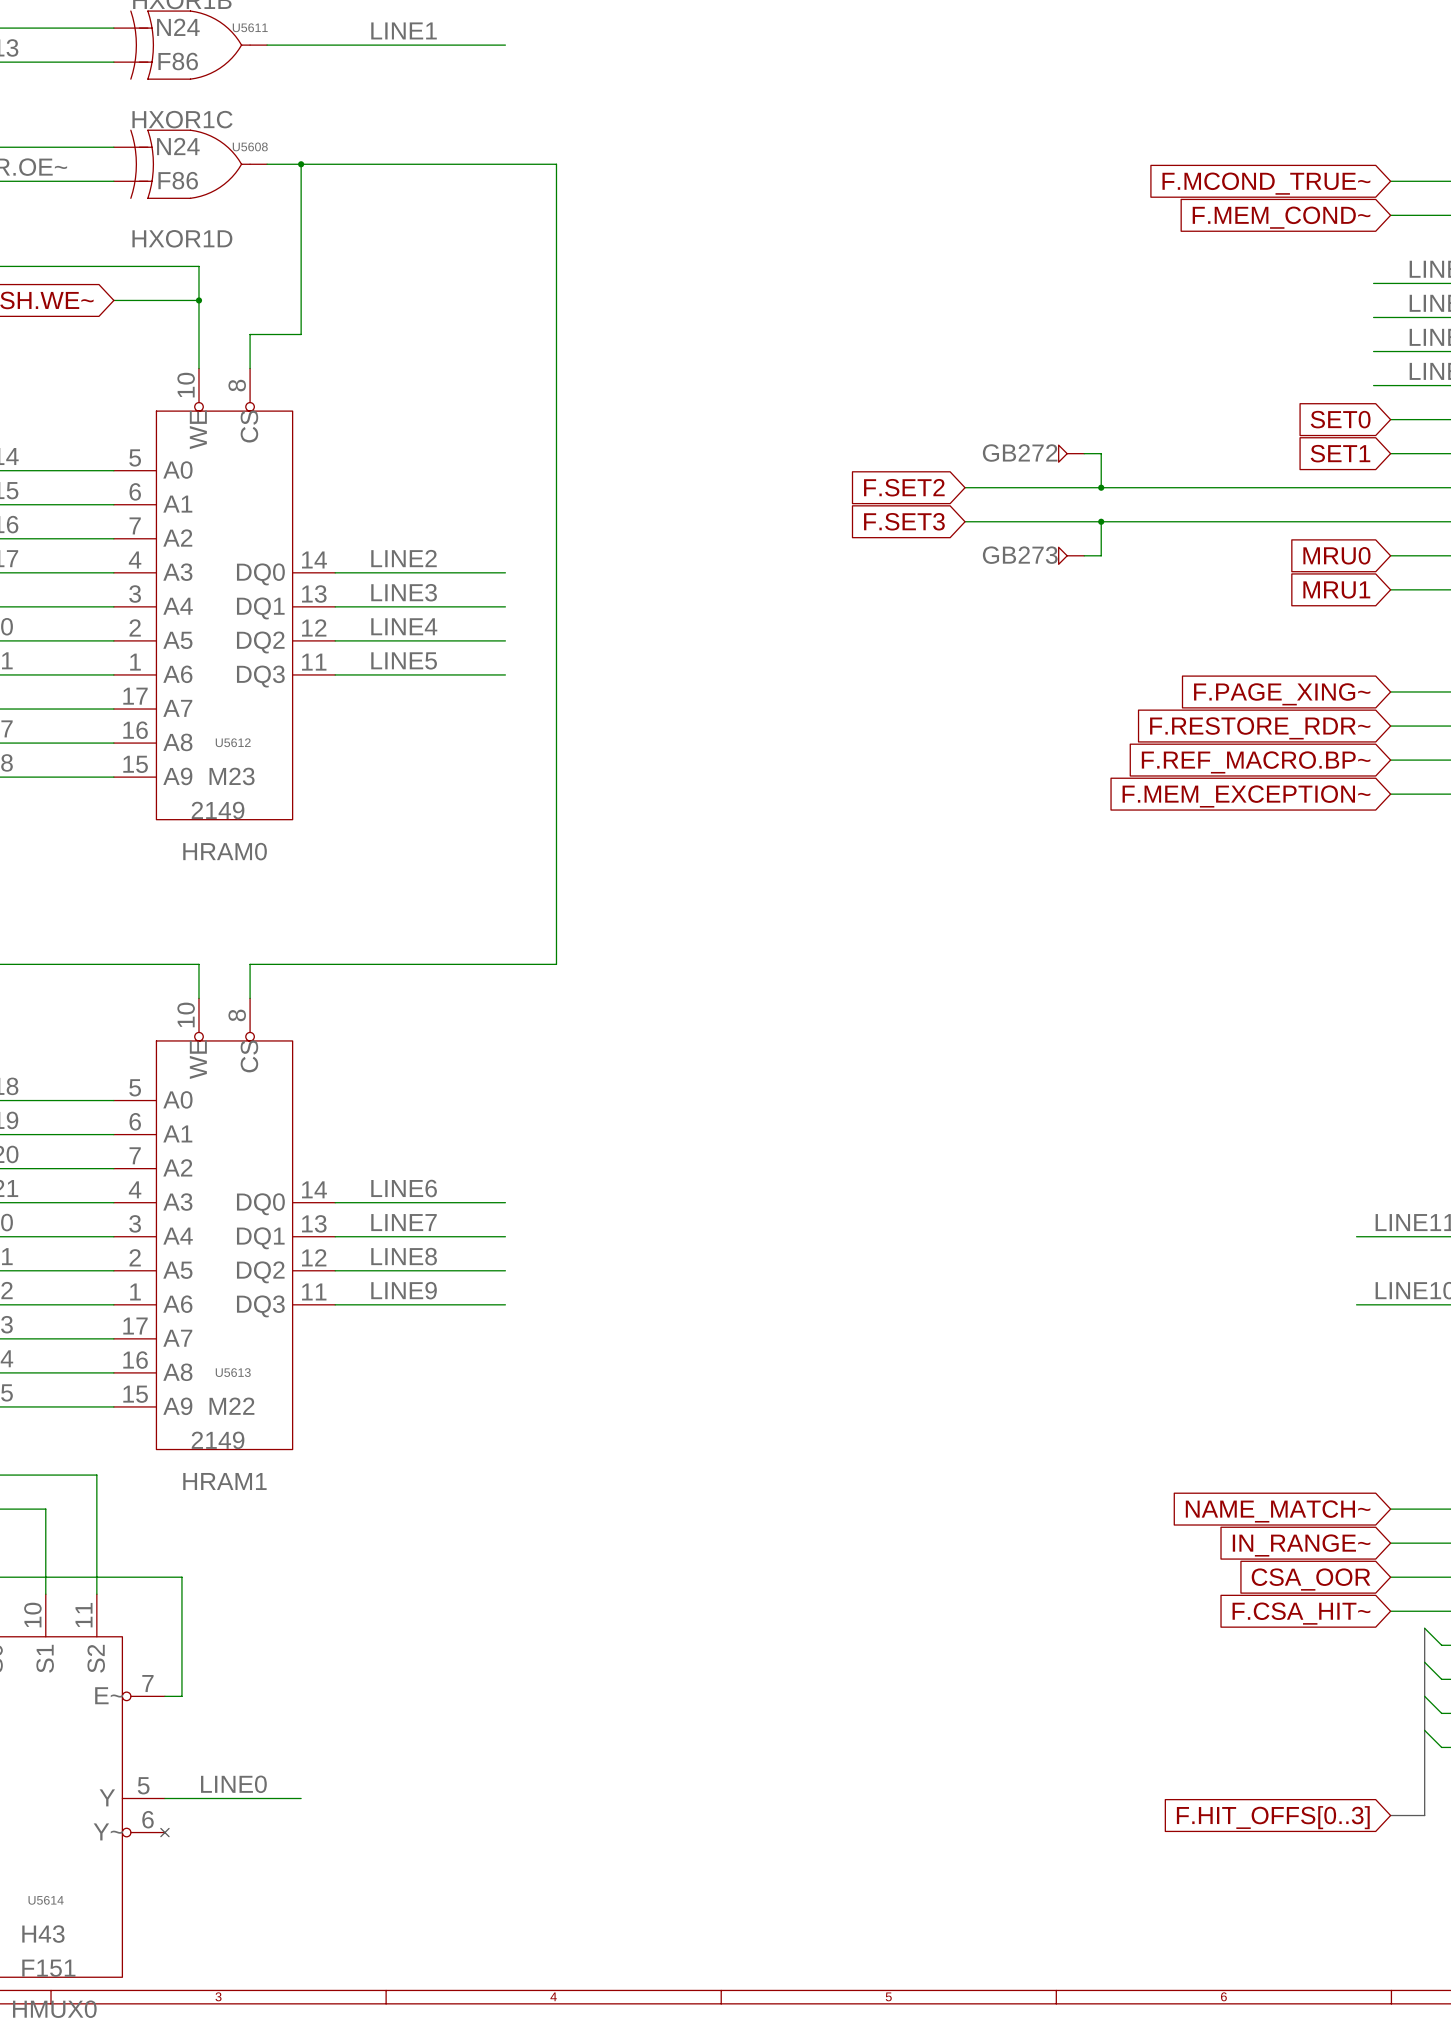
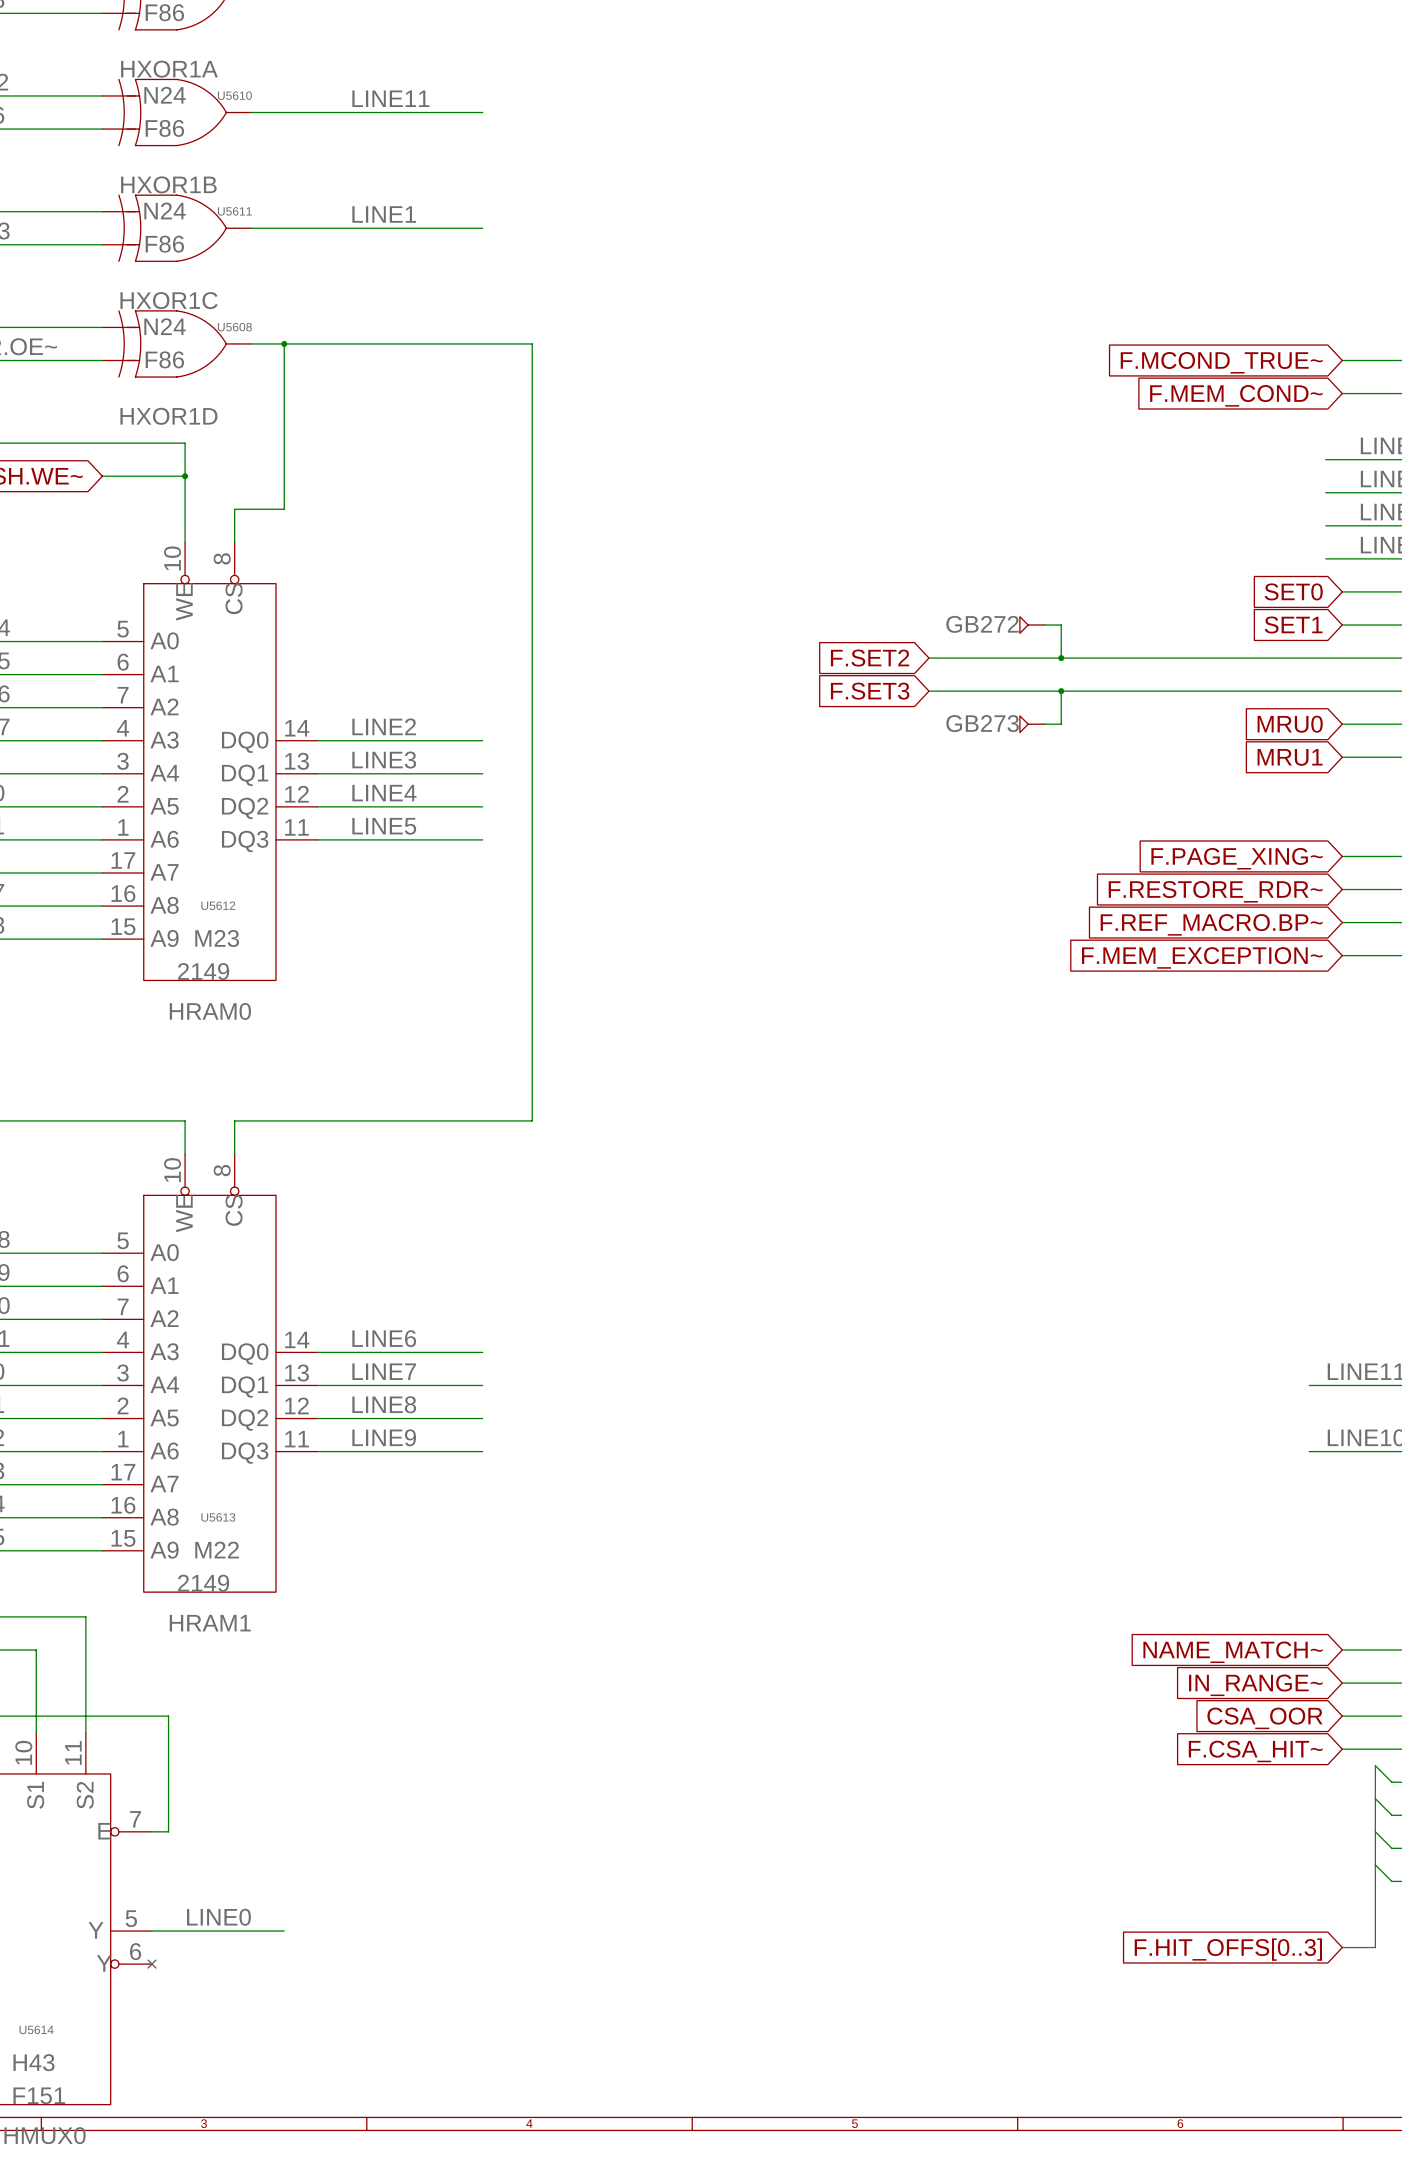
U5614 pin name: E~ (109, 1695) -> E (104, 1831)
U5614 pin name: Y~ (108, 1831) -> Y (104, 1963)

